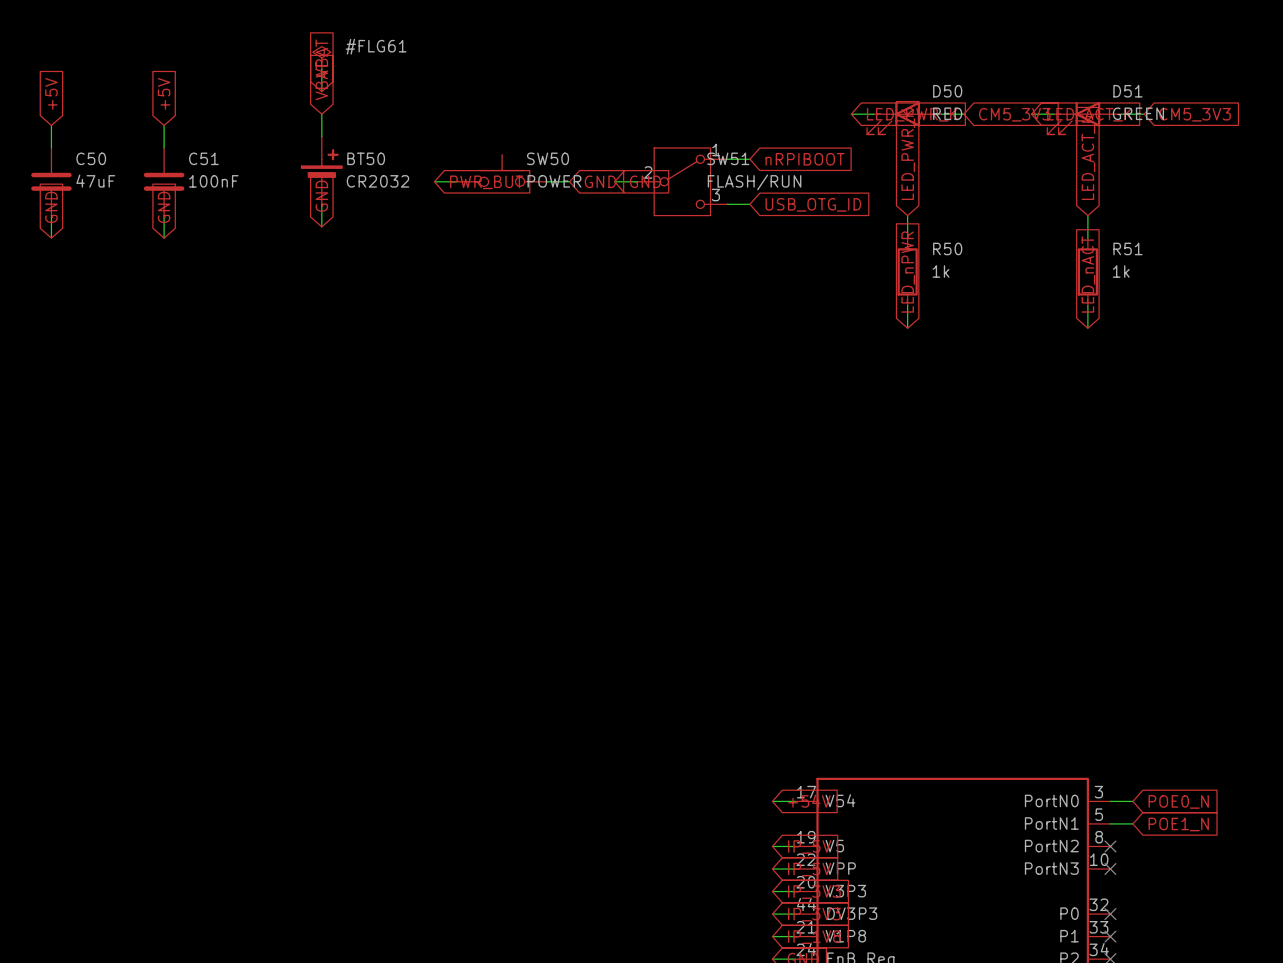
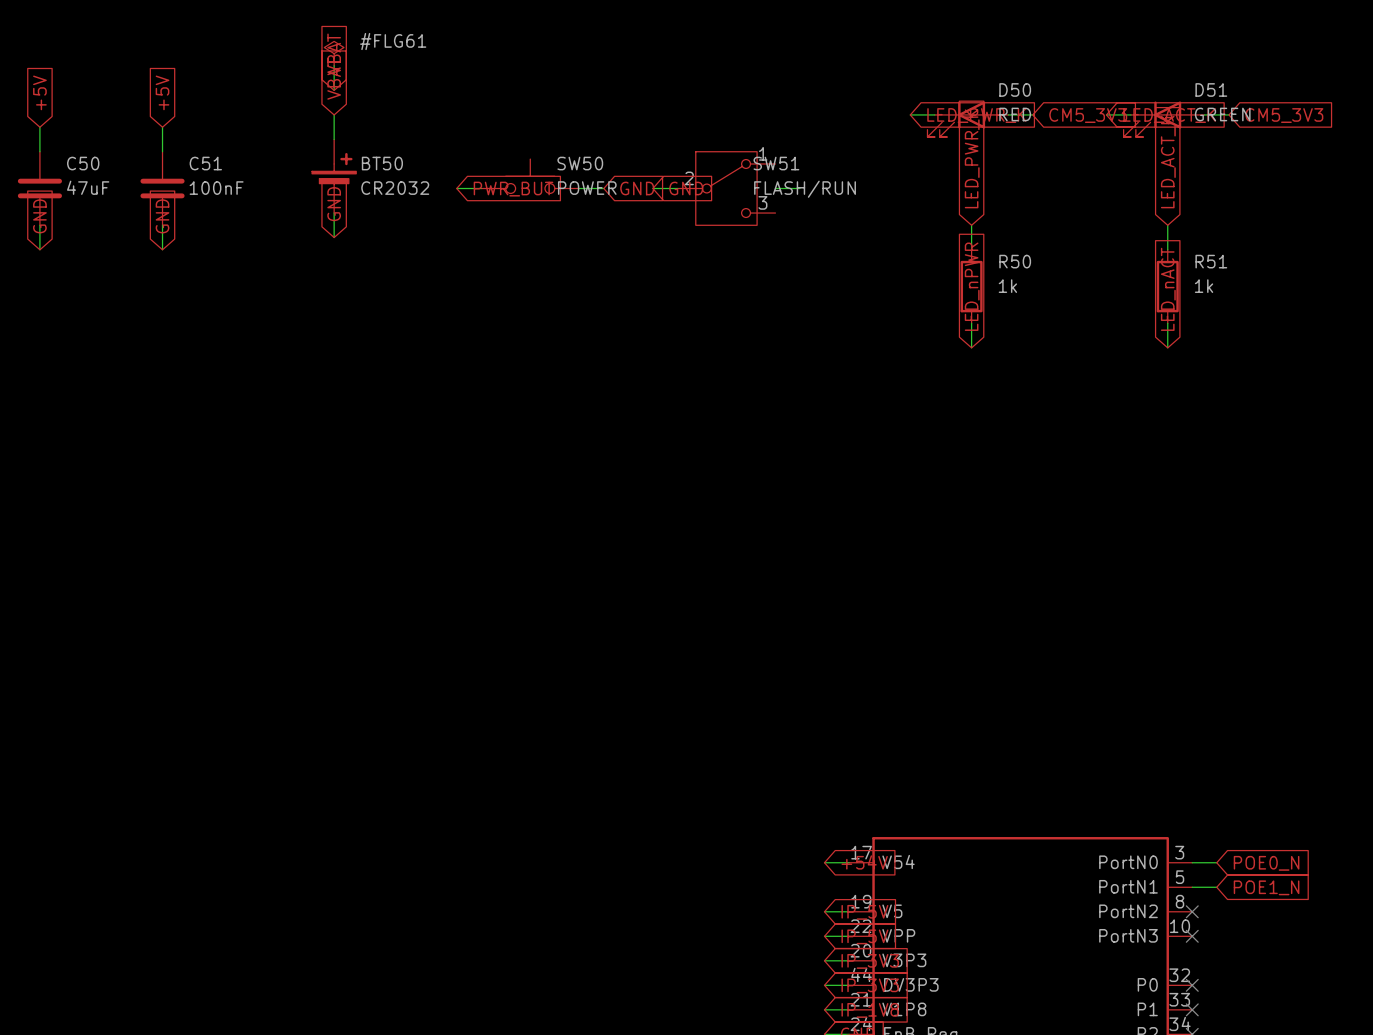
wire: (727, 159) (749, 159) -> (775, 188) (799, 188)
global label: nRPIBOOT (805, 159) -> none
wire: (727, 204) (749, 204) -> none
global label: USB_OTG_ID (813, 204) -> none

